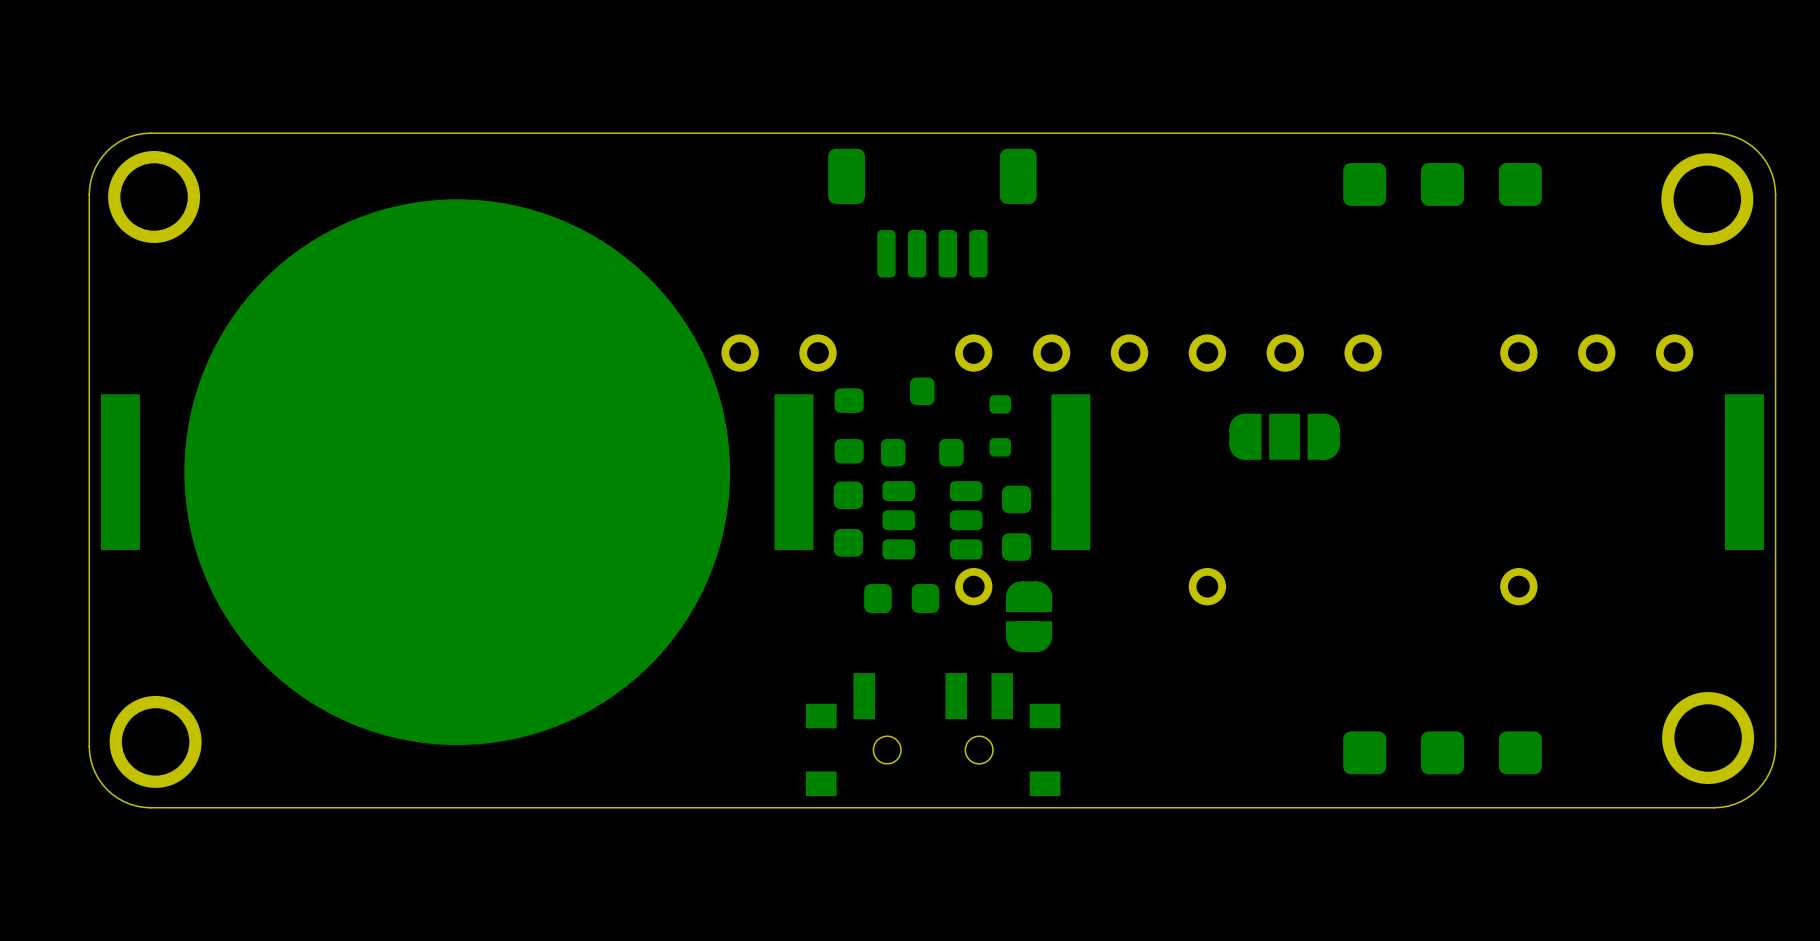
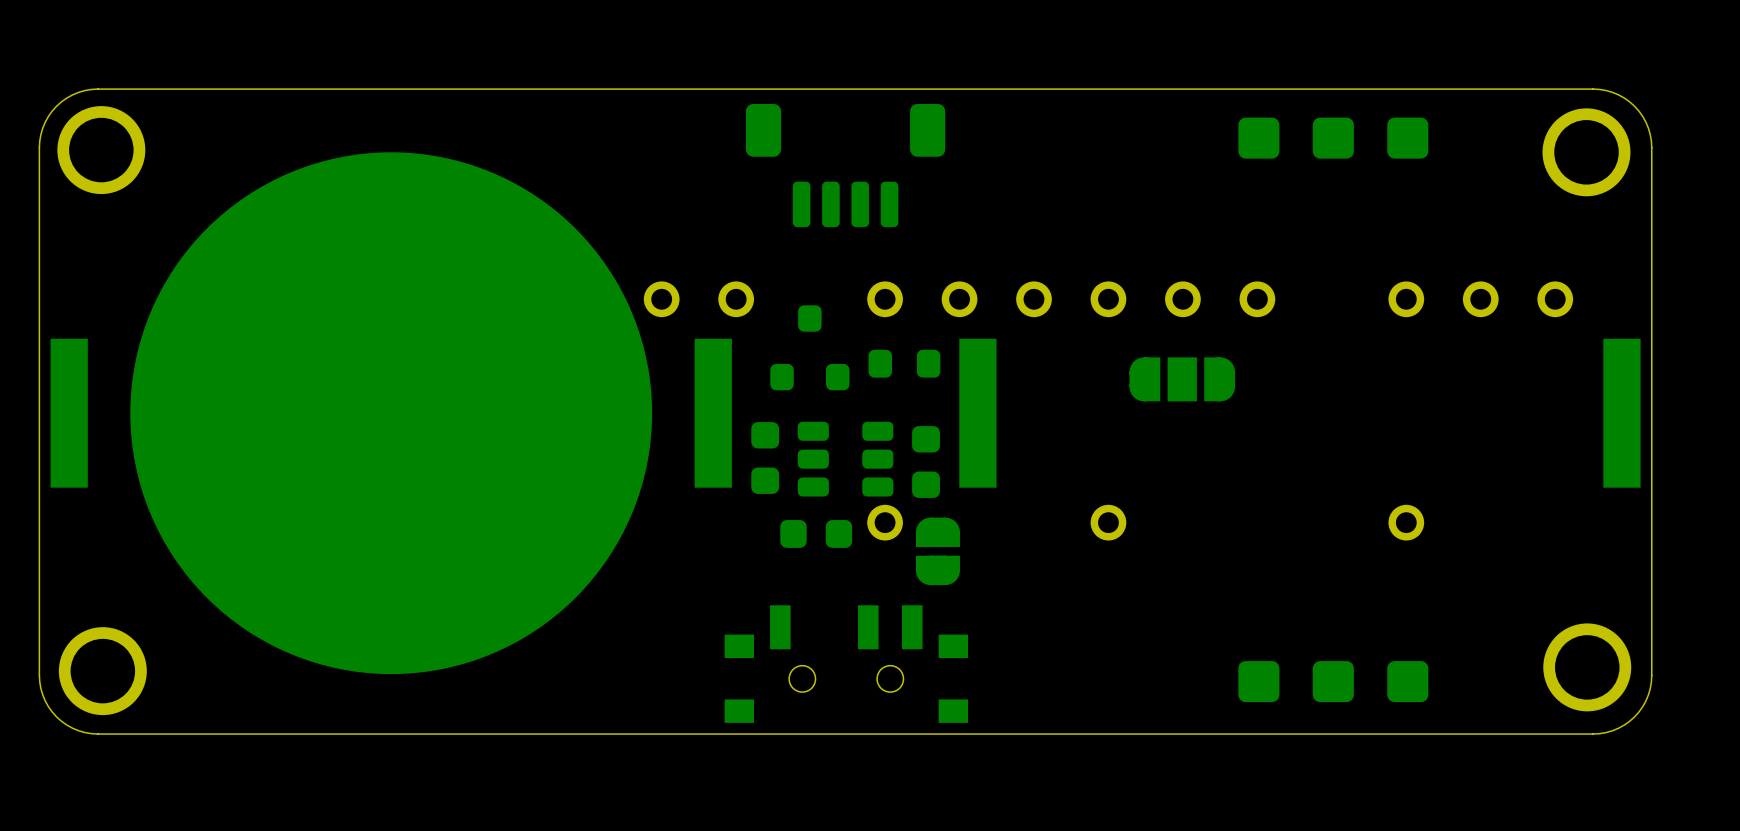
part footprint: [989, 395, 1011, 457] -> [868, 349, 941, 378]
part position: (922, 421) -> (809, 347)
part: (849, 425) -> none

